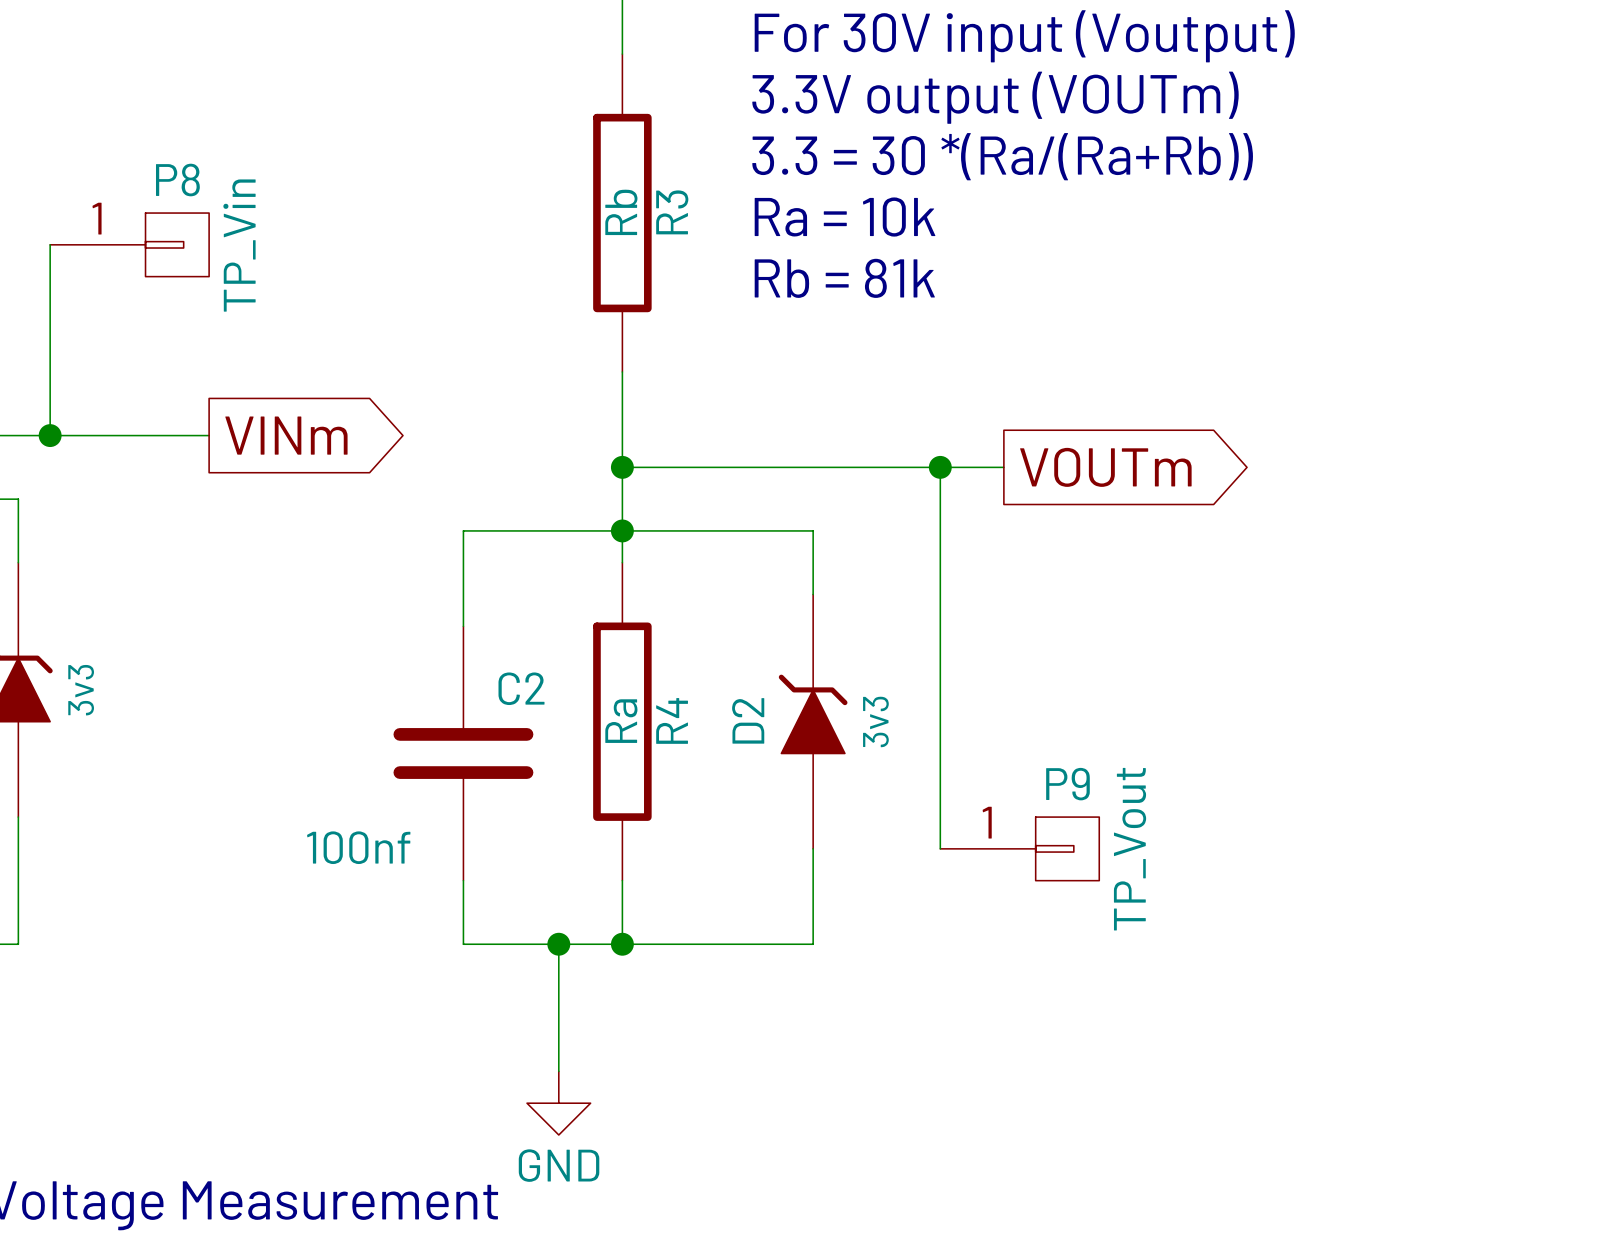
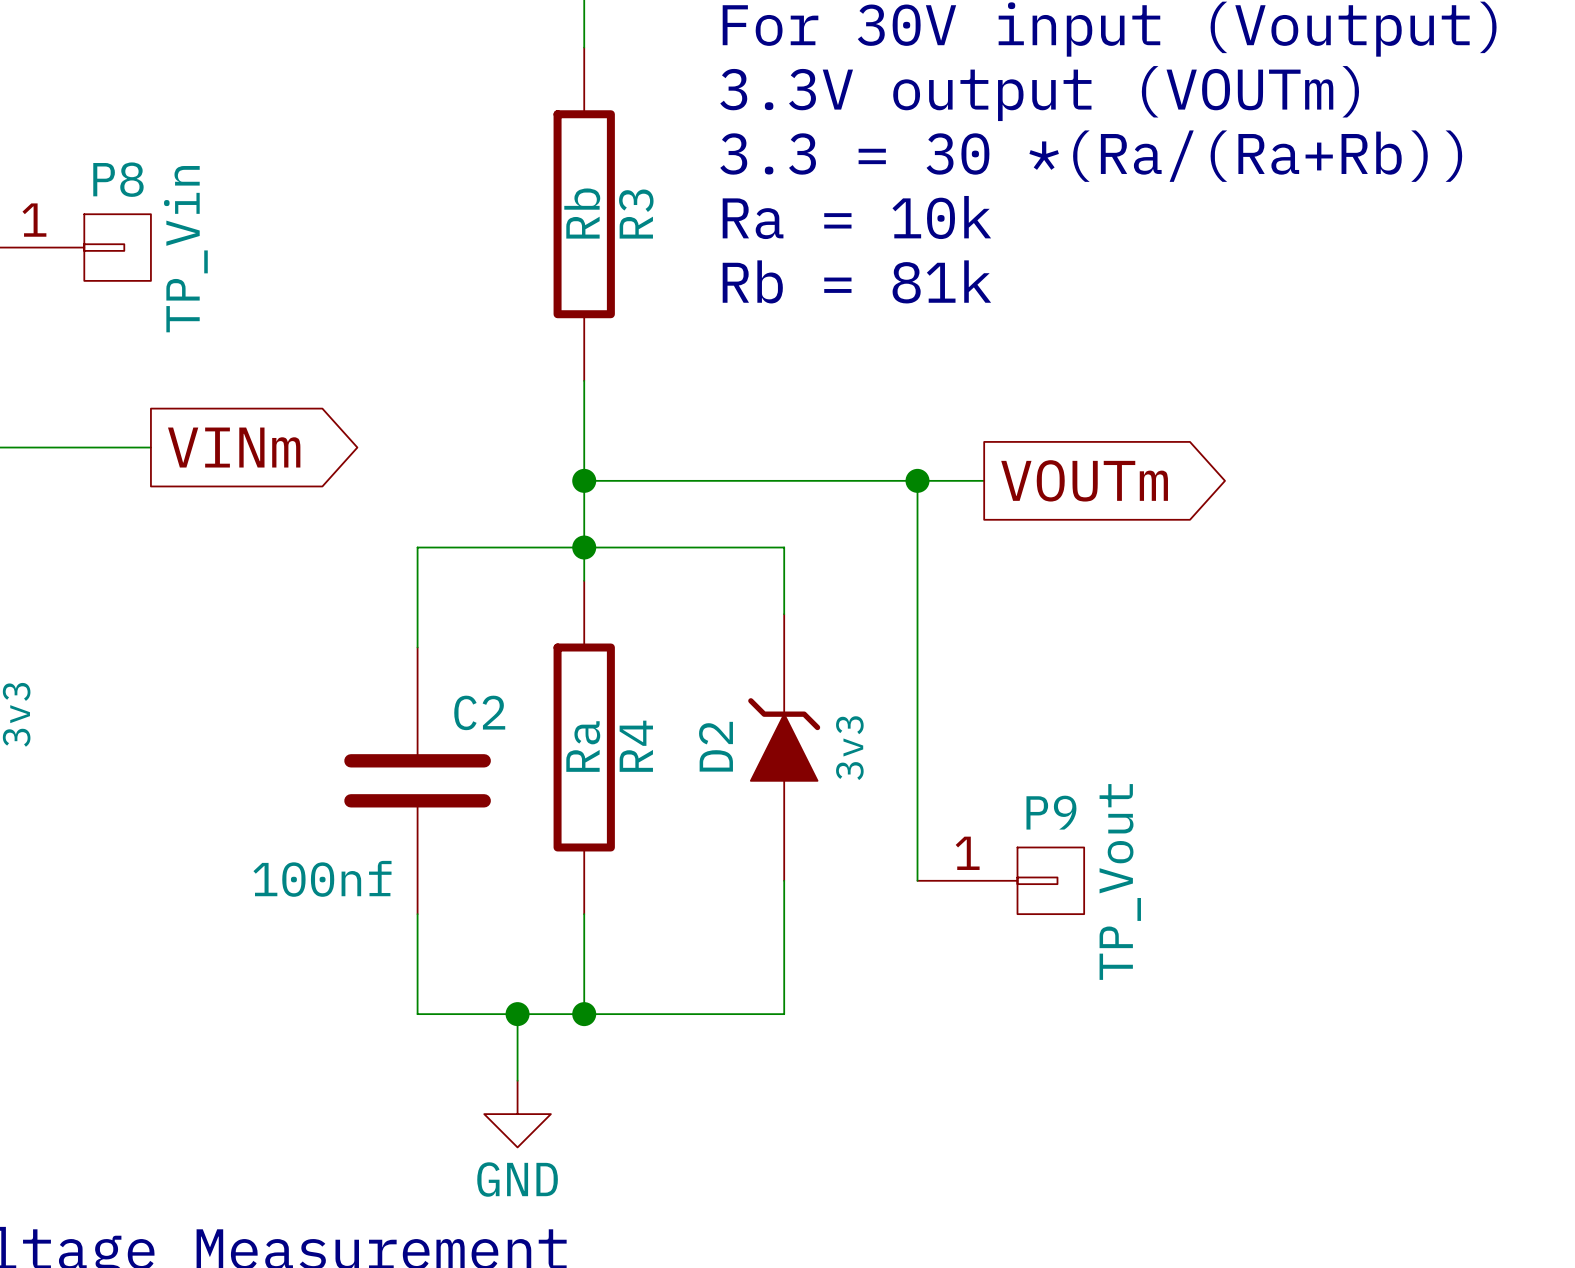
wire: (463, 944) (813, 944) -> (417, 980) (417, 1014) (784, 1014) (784, 980)
wire: (558, 944) (558, 976) -> (584, 980) (584, 1014)
junction position: (558, 944) -> (517, 1014)
junction position: (622, 944) -> (584, 1014)
power symbol position: GND (558, 1103) -> GND (517, 1114)

